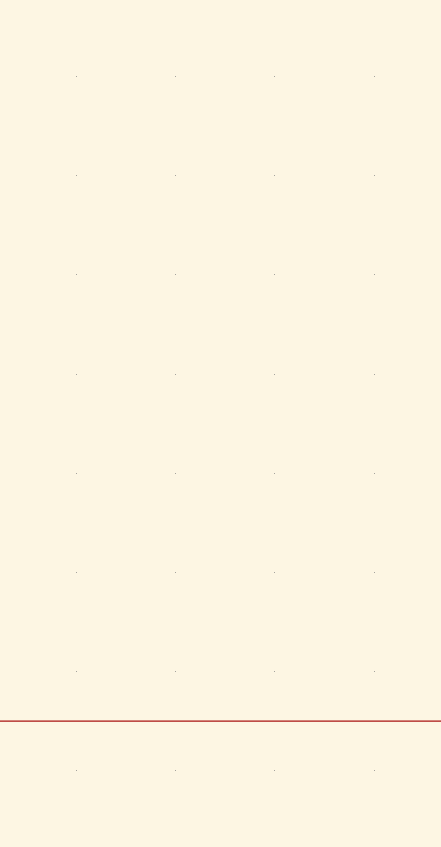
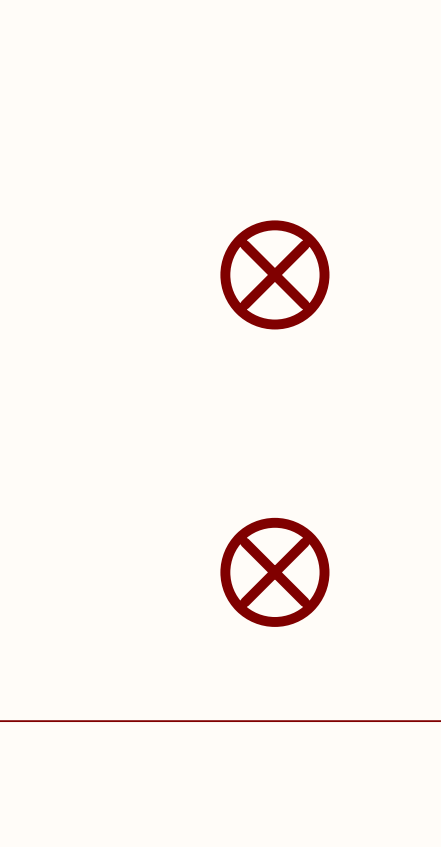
part: none -> (274, 274)
part: none -> (274, 572)

